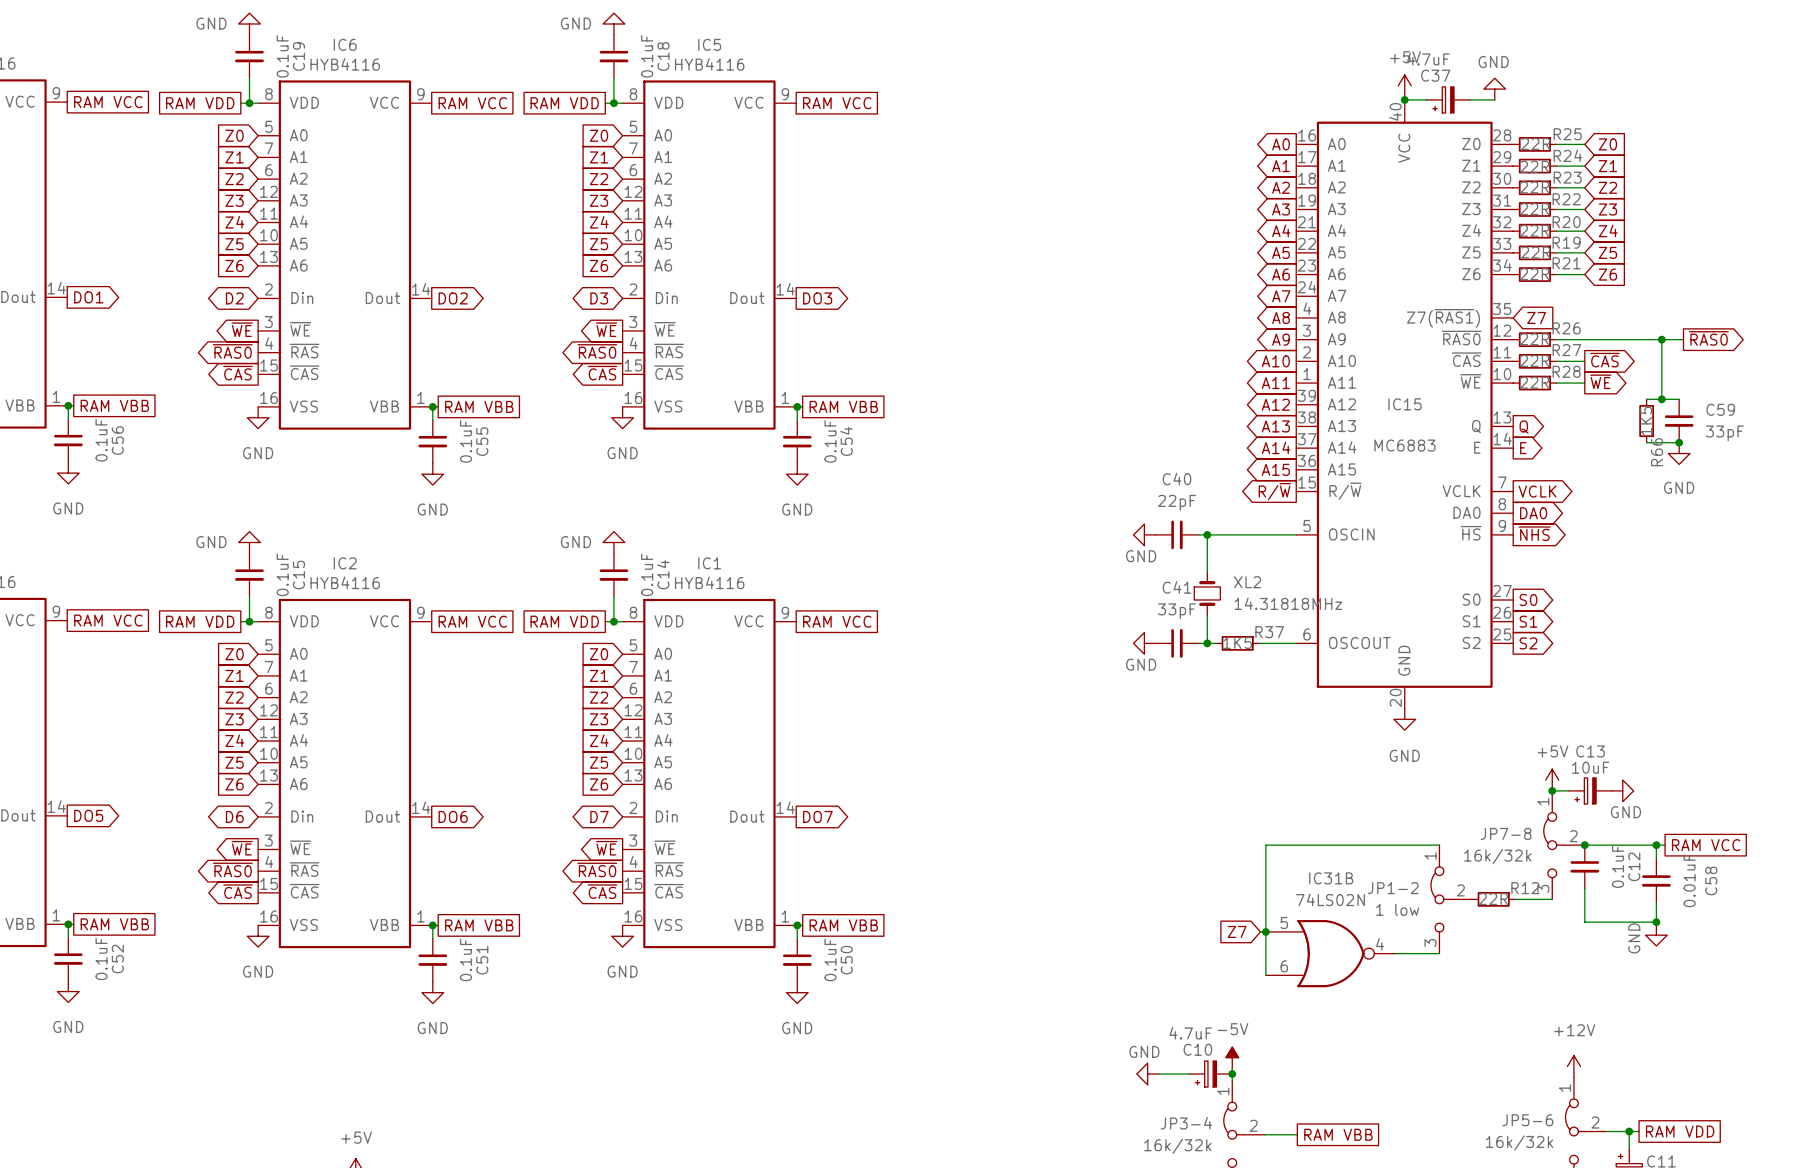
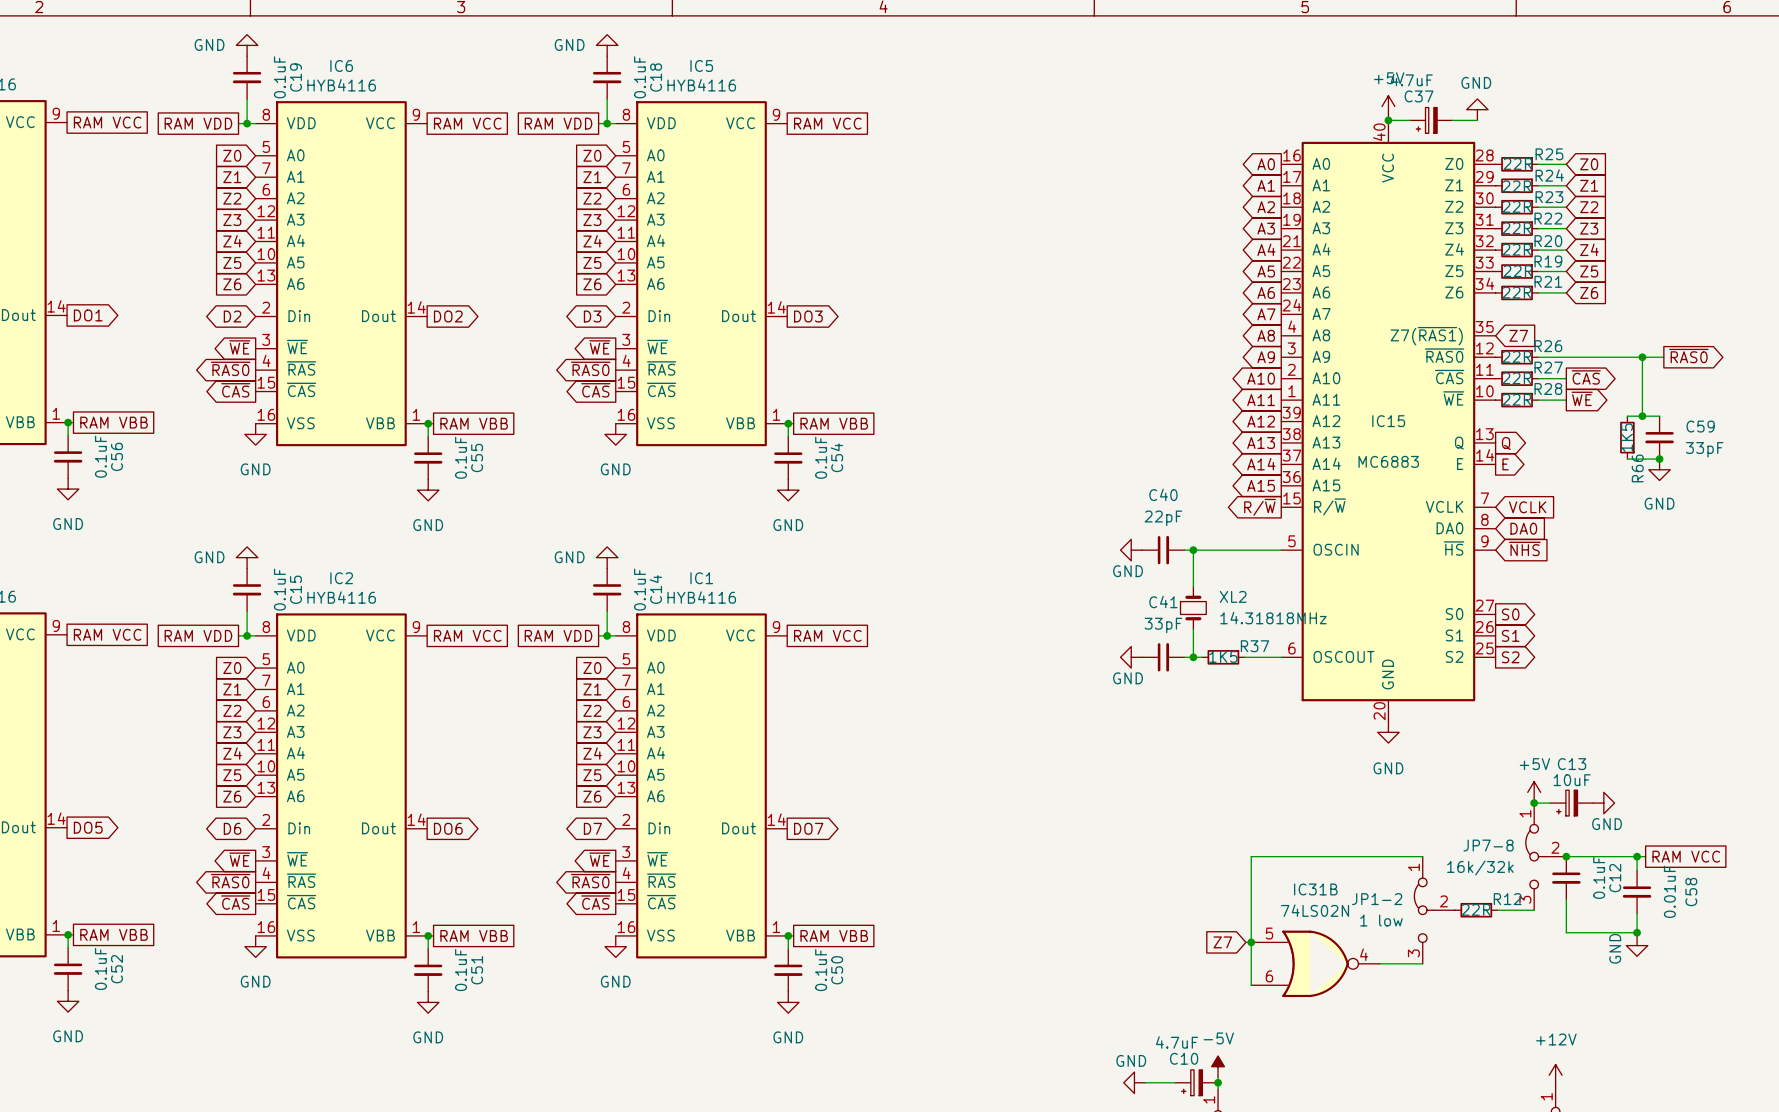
global label shape: output (1537, 491) -> input (1527, 507)
global label shape: output (1533, 513) -> input (1523, 528)
global label shape: output (1534, 533) -> input (1524, 548)

